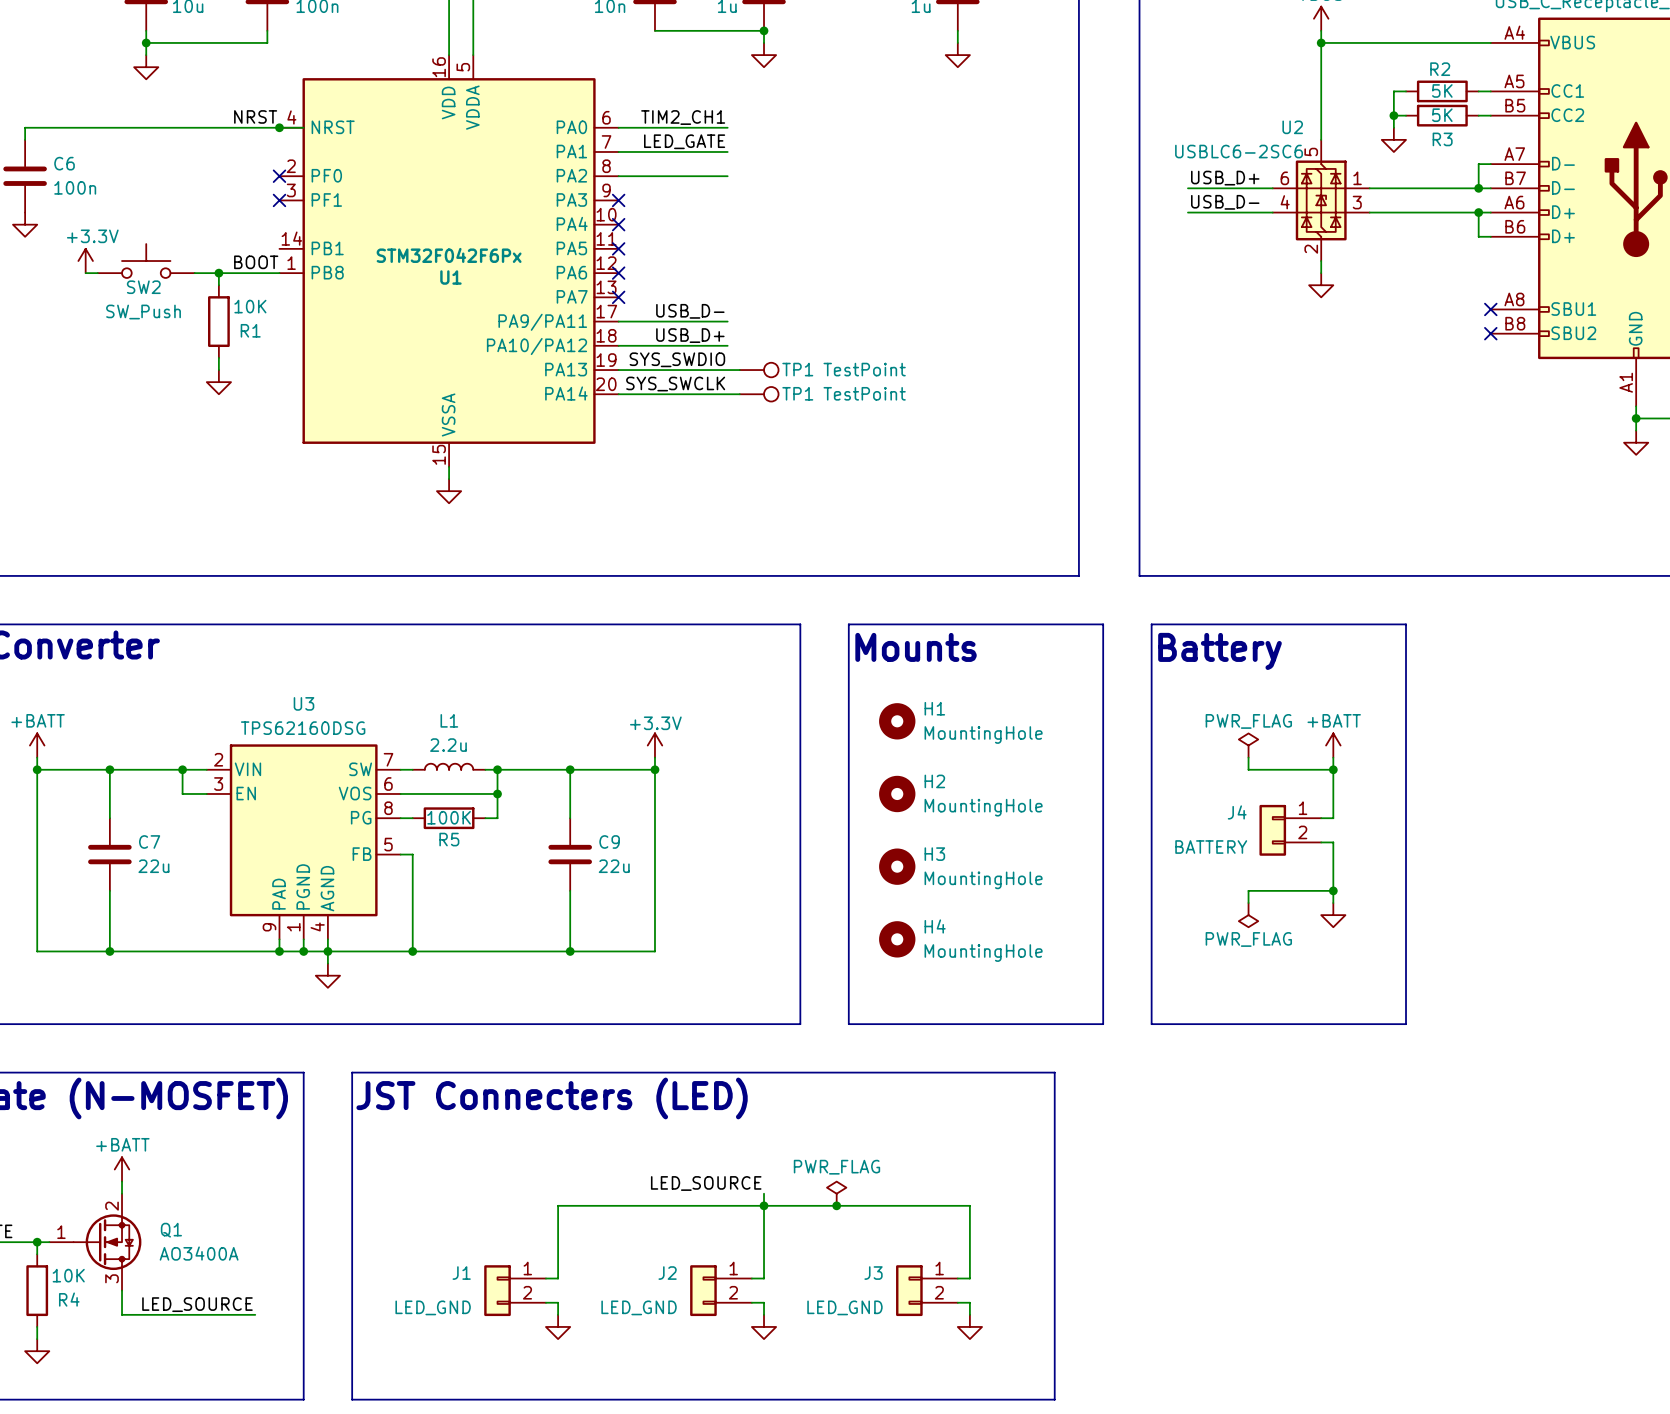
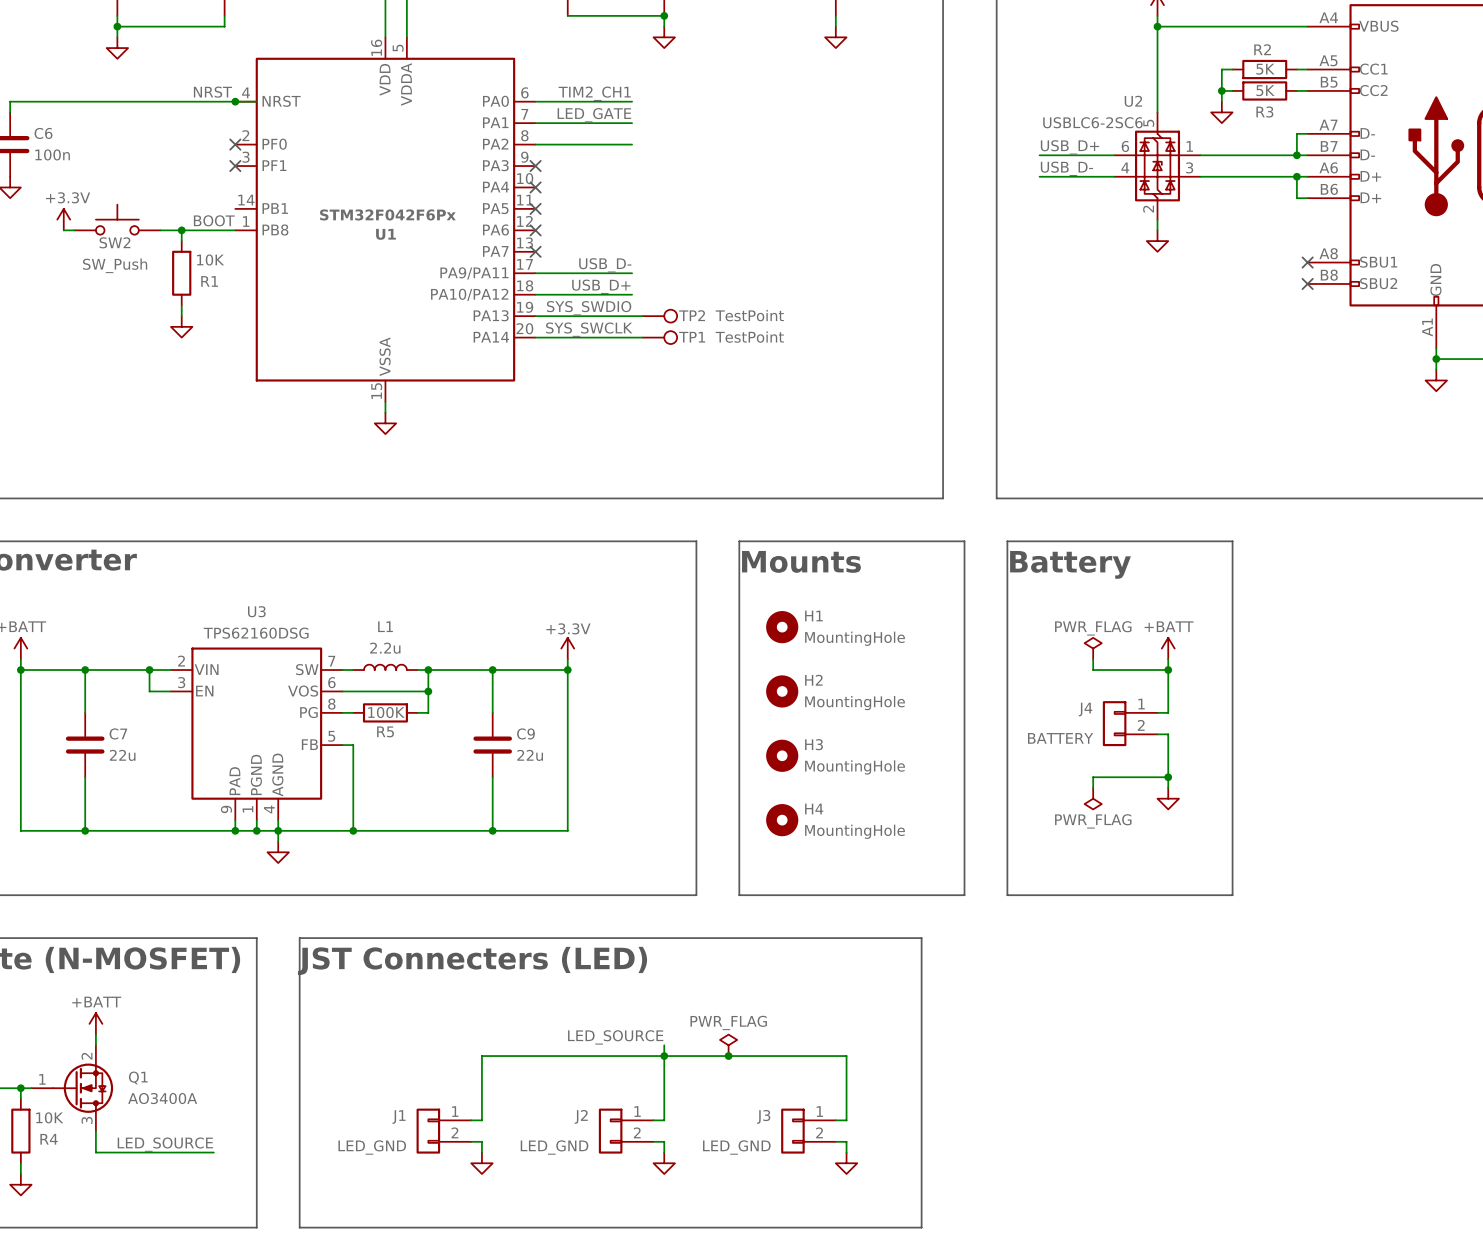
TP1 name: TP1 (797, 369) -> TP2 (692, 315)

